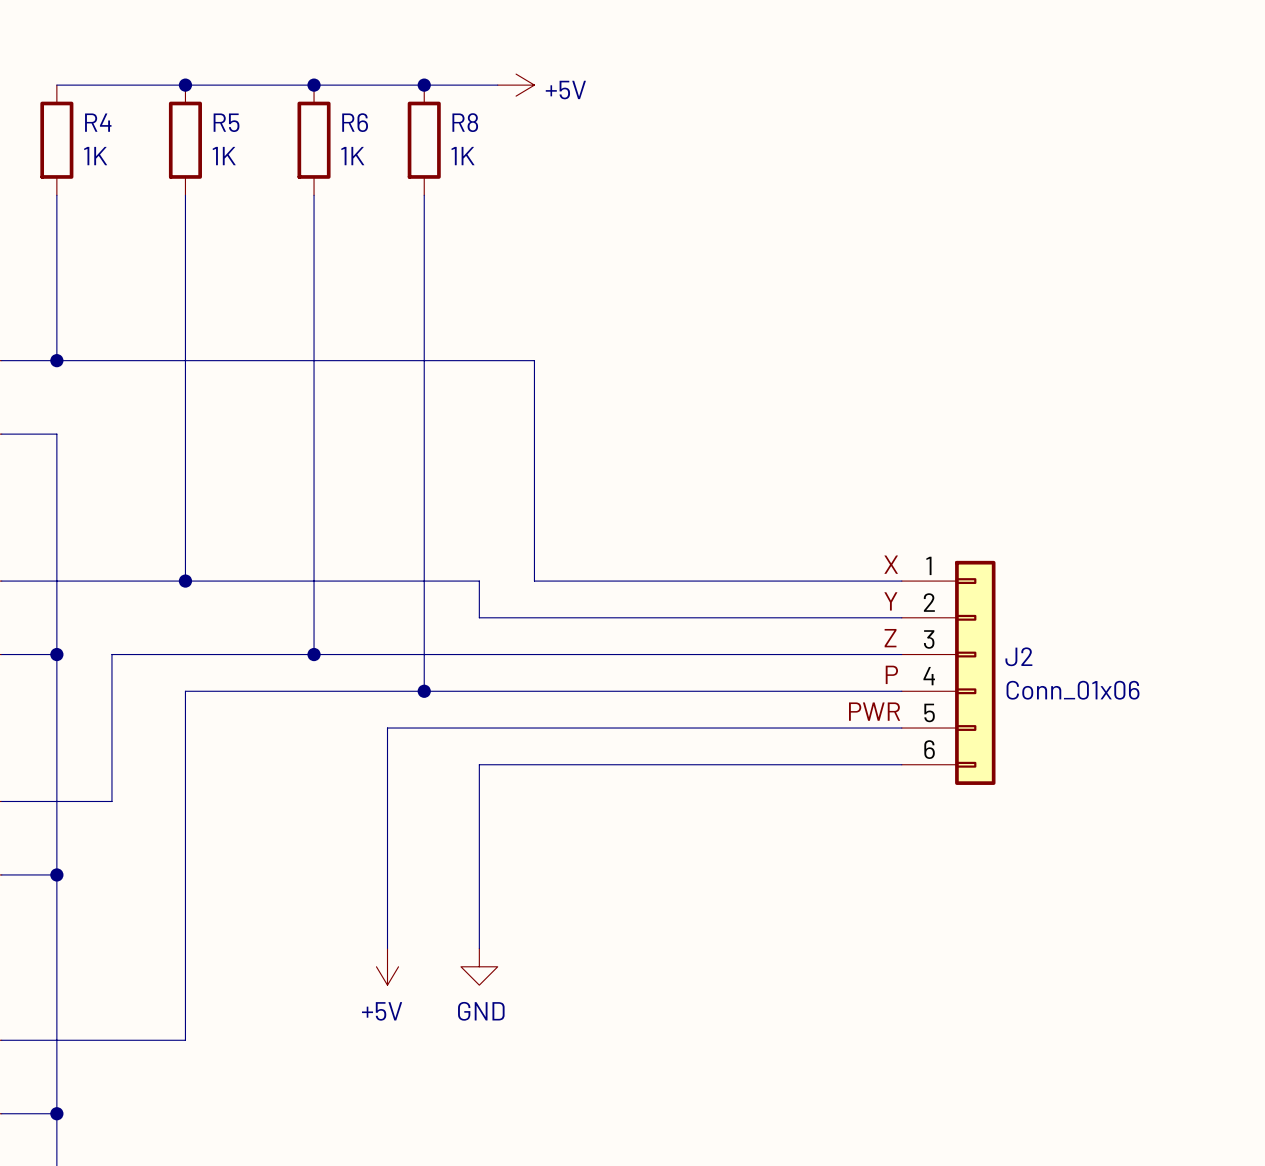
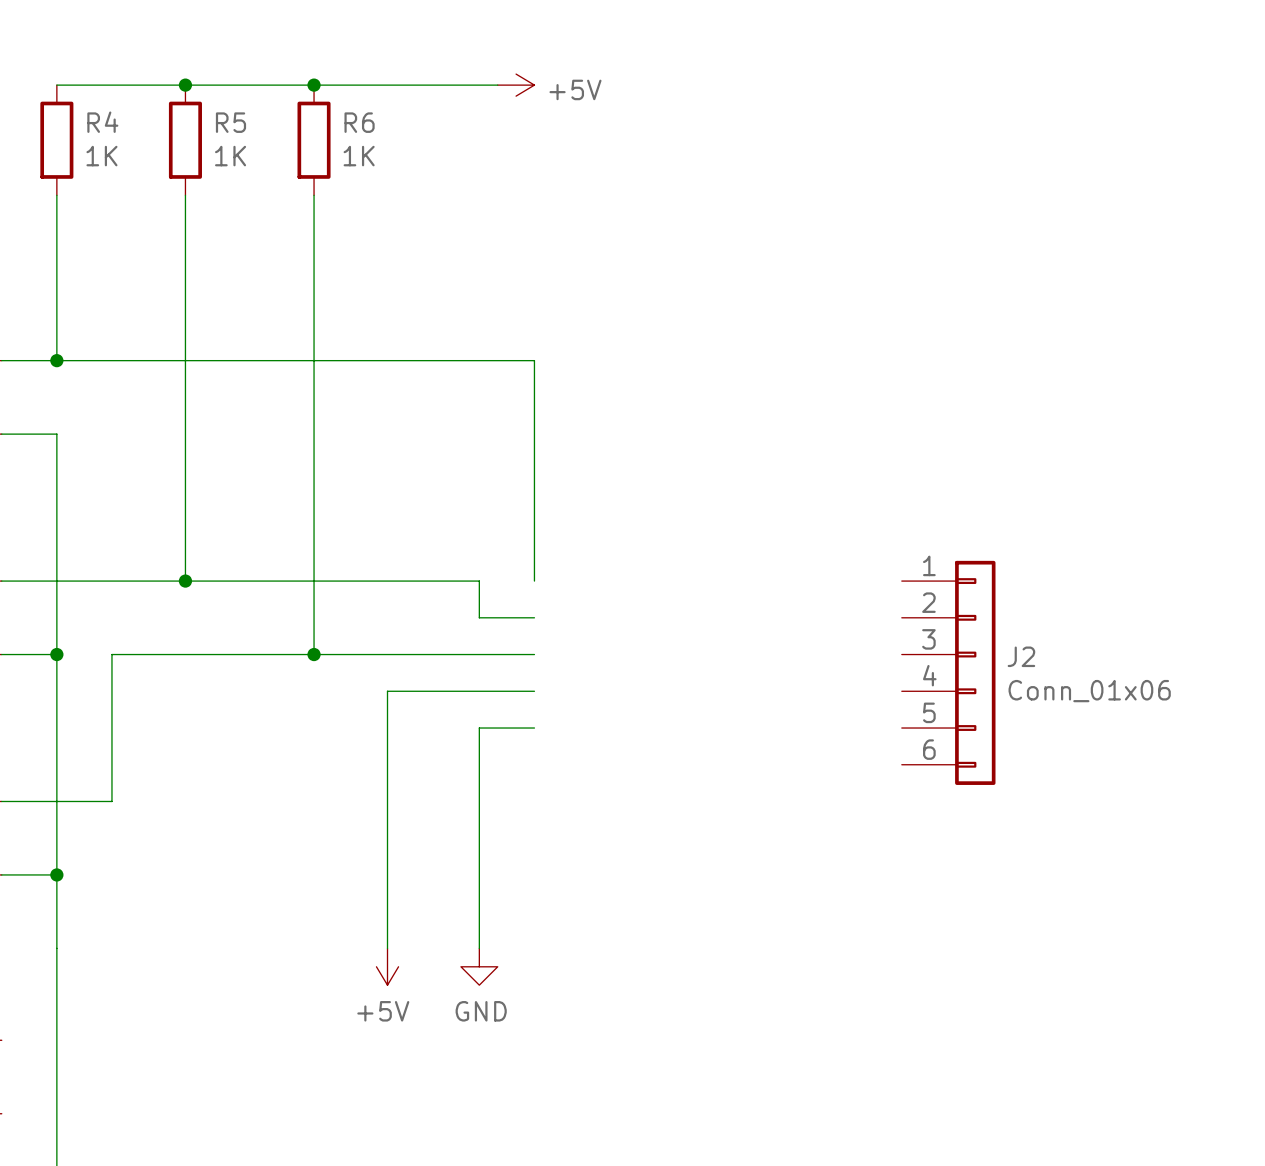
junction: (424, 85) -> none
R8: 1K (424, 140) -> none
wire: (424, 195) (424, 691) -> none
label: X (891, 564) -> none
wire: (534, 581) (901, 581) -> none
label: Y (890, 601) -> none
wire: (534, 617) (901, 617) -> none
label: Z (890, 638) -> none
wire: (534, 654) (901, 654) -> none
label: P (891, 674) -> none
wire: (387, 691) (185, 691) (185, 1040) (1, 1040) -> (387, 691) (387, 728)
junction: (424, 691) -> none
wire: (534, 691) (901, 691) -> none
label: PWR (874, 711) -> none
wire: (387, 728) (479, 728) -> (479, 764) (479, 728)
wire: (534, 728) (901, 728) -> none
wire: (479, 764) (901, 764) -> none
wire: (1, 1113) (56, 1113) -> none
junction: (56, 1113) -> none

